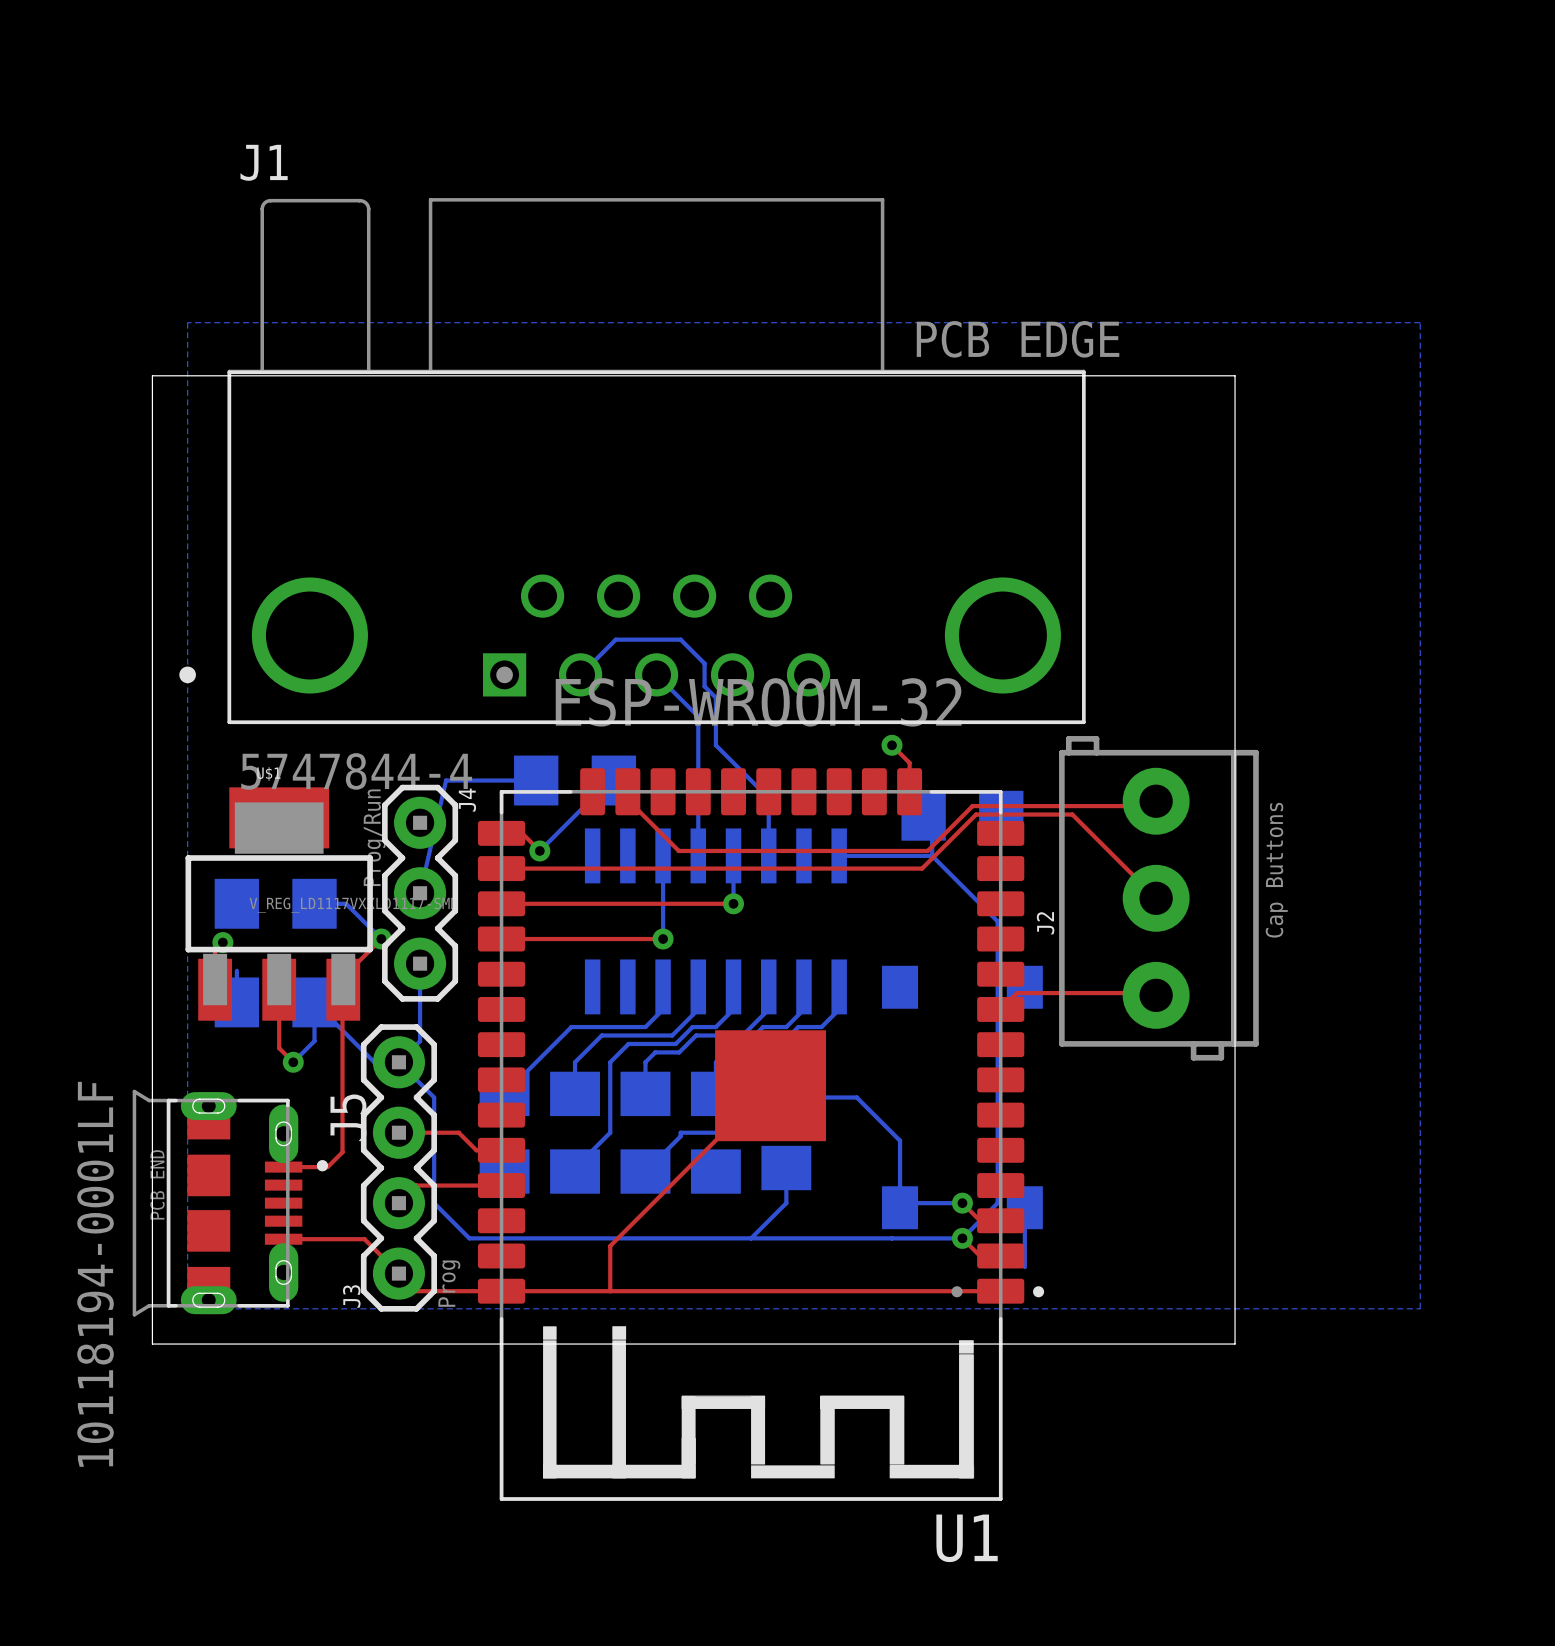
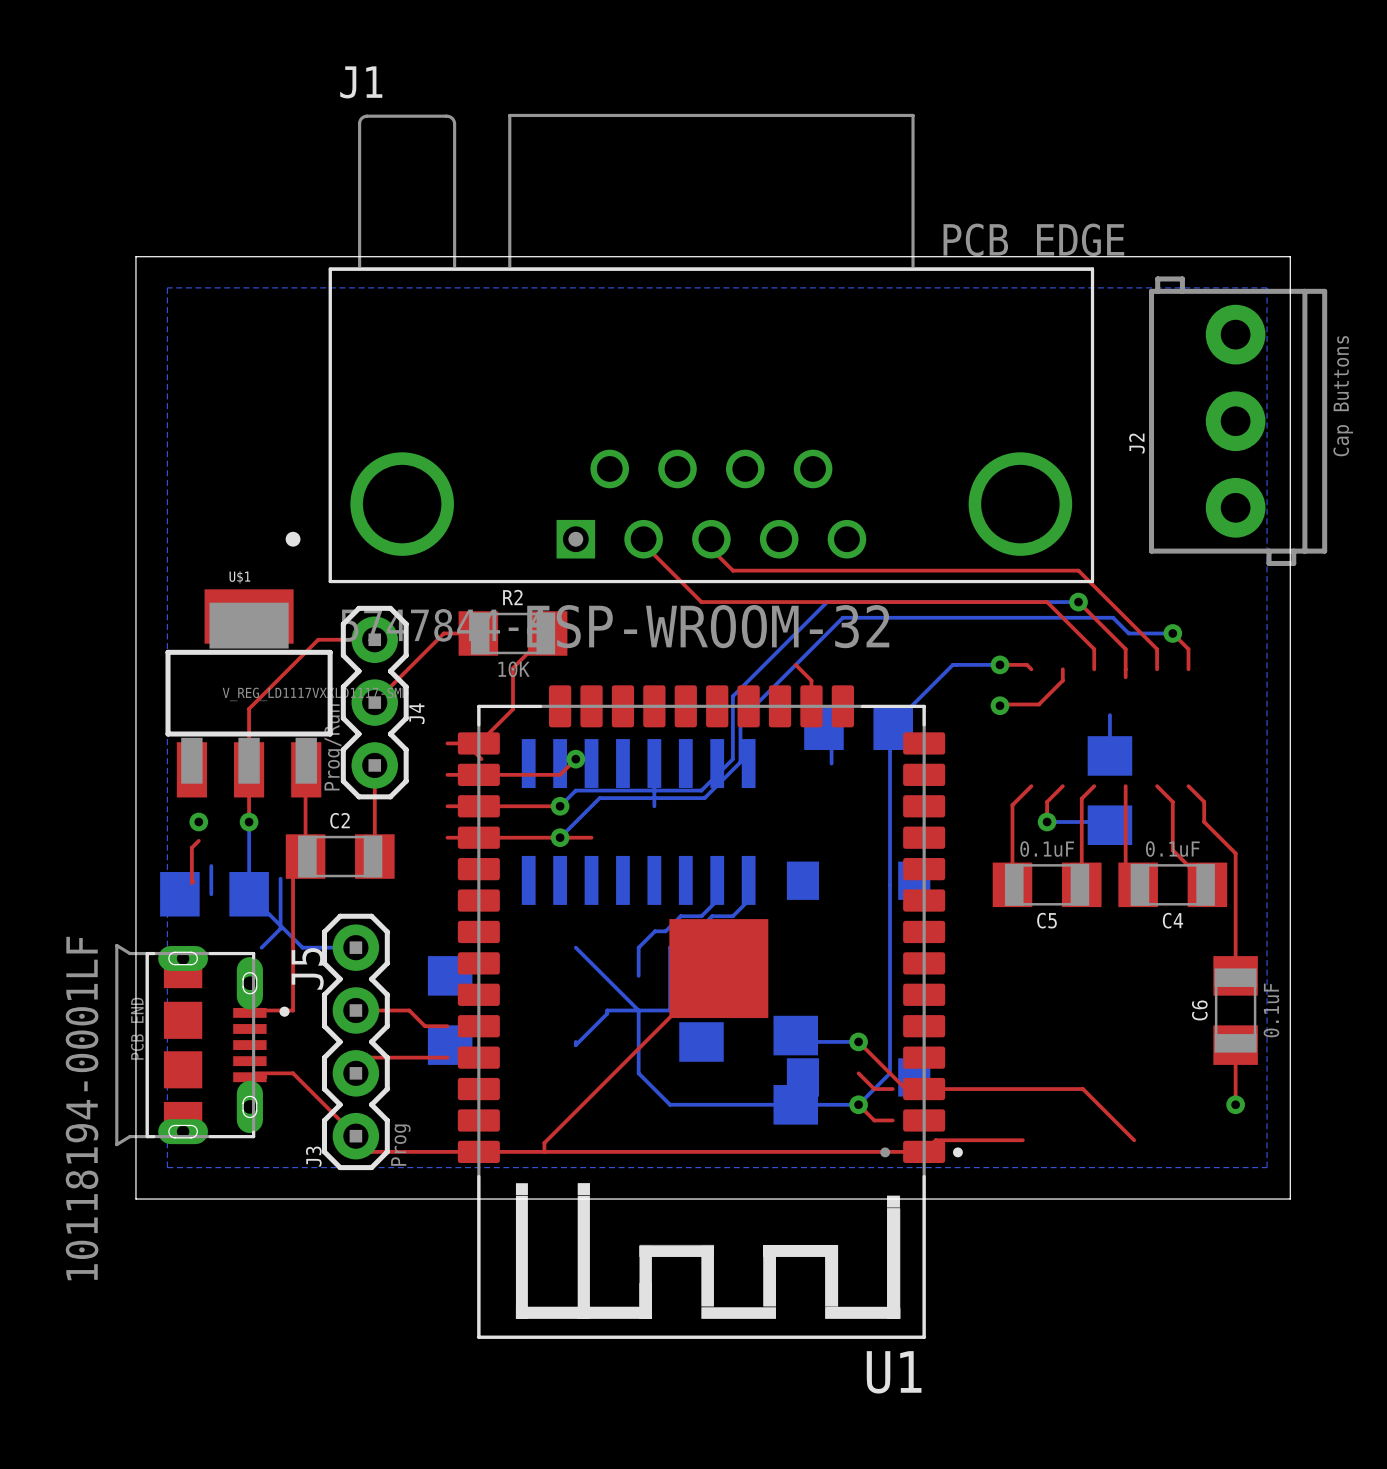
board edge: (152, 375) (1235, 375) (1235, 1344) -> (135, 335) (135, 256) (1290, 256) (1290, 1199) (1101, 1199)
J1 position: (632, 461) -> (689, 348)
top track: none -> (643, 539) (643, 544) (701, 602) (1047, 602) (1094, 649) (1094, 669)
top track: none -> (711, 539) (711, 549) (732, 570) (1078, 570) (1157, 649) (1157, 669)
bottom track: (580, 674) (615, 639) (680, 639) (704, 663) (704, 686) (715, 697) (715, 745) (768, 798) (768, 855) -> none
bottom track: (656, 674) (698, 716) (698, 855) -> none
bottom track: none -> (1078, 602) (827, 602) (732, 696) (732, 759) (701, 790) (575, 790) (560, 806)
top track: none -> (1078, 602) (1125, 649) (1125, 677)
via: none -> (1078, 602)
top track: none -> (478, 633) (443, 633) (374, 702)
top track: none -> (547, 633) (512, 668) (512, 709) (478, 743)
bottom track: none -> (1172, 633) (1128, 633) (1113, 617) (842, 617) (740, 720) (740, 762) (704, 798) (599, 798) (560, 837)
top track: none -> (1172, 633) (1188, 649) (1188, 669)
via: none -> (1172, 633)
top track: none -> (374, 639) (318, 639) (249, 708) (249, 822)
via: (892, 745) -> none
top track: none -> (999, 664) (1027, 664) (1031, 669)
via: none -> (999, 664)
top track: none -> (1062, 669) (1062, 680) (1038, 704) (999, 705)
bottom track: (536, 780) (446, 780) (420, 893) -> none
R2 side: bottom (575, 780) -> top (512, 633)
bottom track: (613, 780) (610, 780) (539, 850) -> none
top track: (627, 791) (627, 799) (678, 850) (927, 850) (972, 806) (1151, 806) (1156, 801) -> none
via: none -> (999, 705)
bottom track: none -> (1109, 715) (1109, 755)
via: (539, 850) -> none
via: none -> (575, 759)
bottom track: (663, 855) (663, 939) -> none
bottom track: (839, 855) (932, 855) (997, 921) -> (999, 664) (952, 664) (890, 727) (890, 821)
top track: none -> (374, 765) (374, 856)
top track: none -> (306, 769) (305, 856)
top track: (627, 868) (922, 868) (976, 814) (1072, 814) (1156, 898) -> (560, 774) (575, 759)
top track: none -> (1031, 786) (1012, 805) (1012, 884)
top track: none -> (1062, 786) (1047, 801) (1047, 821)
top track: none -> (1094, 786) (1081, 798) (1081, 884)
top track: none -> (1125, 786) (1125, 872) (1138, 884)
top track: none -> (1157, 786) (1172, 801) (1172, 850) (1207, 884)
top track: none -> (1188, 786) (1204, 801) (1204, 821) (1235, 853) (1235, 975)
part: none -> (1109, 790)
J4 position: (420, 893) -> (374, 702)
J2 position: (1158, 898) -> (1238, 421)
C2 side: bottom (275, 903) -> top (340, 856)
bottom track: (314, 903) (346, 903) (381, 939) -> none
top track: (627, 903) (733, 903) -> none
via: none -> (560, 806)
via: (733, 903) -> none
U$1 position: (279, 904) -> (249, 693)
via: none -> (249, 822)
bottom track: none -> (1047, 821) (1106, 821) (1109, 825)
via: none -> (1047, 821)
top track: (381, 939) (343, 977) (342, 1152) (327, 1167) (284, 1167) -> none
via: (381, 939) -> none
via: none -> (560, 837)
via: (663, 939) -> none
via position: (222, 942) -> (198, 821)
top track: none -> (305, 856) (293, 869) (293, 1010) (252, 1010) (249, 1012)
bottom track: (420, 963) (420, 1041) (398, 1062) (434, 1097) (434, 1203) (469, 1238) (962, 1238) -> (575, 947) (638, 1010) (638, 1073) (670, 1104) (858, 1104)
bottom track: (663, 986) (663, 1009) (645, 1027) (571, 1027) (504, 1093) -> none
bottom track: (698, 986) (698, 1009) (672, 1035) (601, 1035) (575, 1062) (575, 1093) -> none
bottom track: (733, 986) (733, 1009) (715, 1027) (692, 1027) (675, 1043) (628, 1043) (610, 1062) (610, 1132) (575, 1167) (575, 1171) -> none
bottom track: (768, 986) (768, 1009) (742, 1035) (696, 1035) (679, 1052) (655, 1052) (645, 1062) (645, 1093) -> none
top track: (279, 989) (279, 1048) (293, 1062) -> none
C4: none -> 0.1uF (1172, 884)
top track: (1156, 995) (1153, 993) (1017, 993) (1000, 1009) -> none
part position: (275, 1002) -> (214, 894)
bottom track: (314, 1002) (374, 1062) -> (249, 822) (249, 894) (302, 947) (333, 947)
via: (293, 1062) -> none
top track: (770, 1085) (610, 1246) (610, 1281) -> (718, 968) (544, 1142)
bottom track: (786, 1090) (793, 1097) (856, 1097) (900, 1140) (900, 1207) (904, 1203) (962, 1203) -> none
part: (575, 1132) -> none
C5 side: bottom (645, 1132) -> top (1047, 884)
part: (715, 1132) -> none
C6: none -> 0.1uF (1235, 1010)
U1 position: (761, 1134) -> (710, 1012)
bottom track: none -> (795, 1035) (802, 1041) (858, 1041)
top track: none -> (858, 1041) (905, 1089) (1082, 1089) (1134, 1140)
bottom track: (786, 1168) (786, 1203) (751, 1238) -> none
top track: none -> (1235, 1045) (1235, 1104)
part: none -> (795, 1070)
J5 position: (230, 1203) -> (202, 1045)
via position: (962, 1203) -> (858, 1041)
bottom track: (1024, 1207) (1024, 1267) -> none
via: none -> (1235, 1104)
top track: (283, 1239) (364, 1239) -> (265, 1077) (249, 1077) (253, 1073) (293, 1073) (325, 1105)
top track: none -> (1022, 1140) (935, 1140) (924, 1151) (892, 1151)

